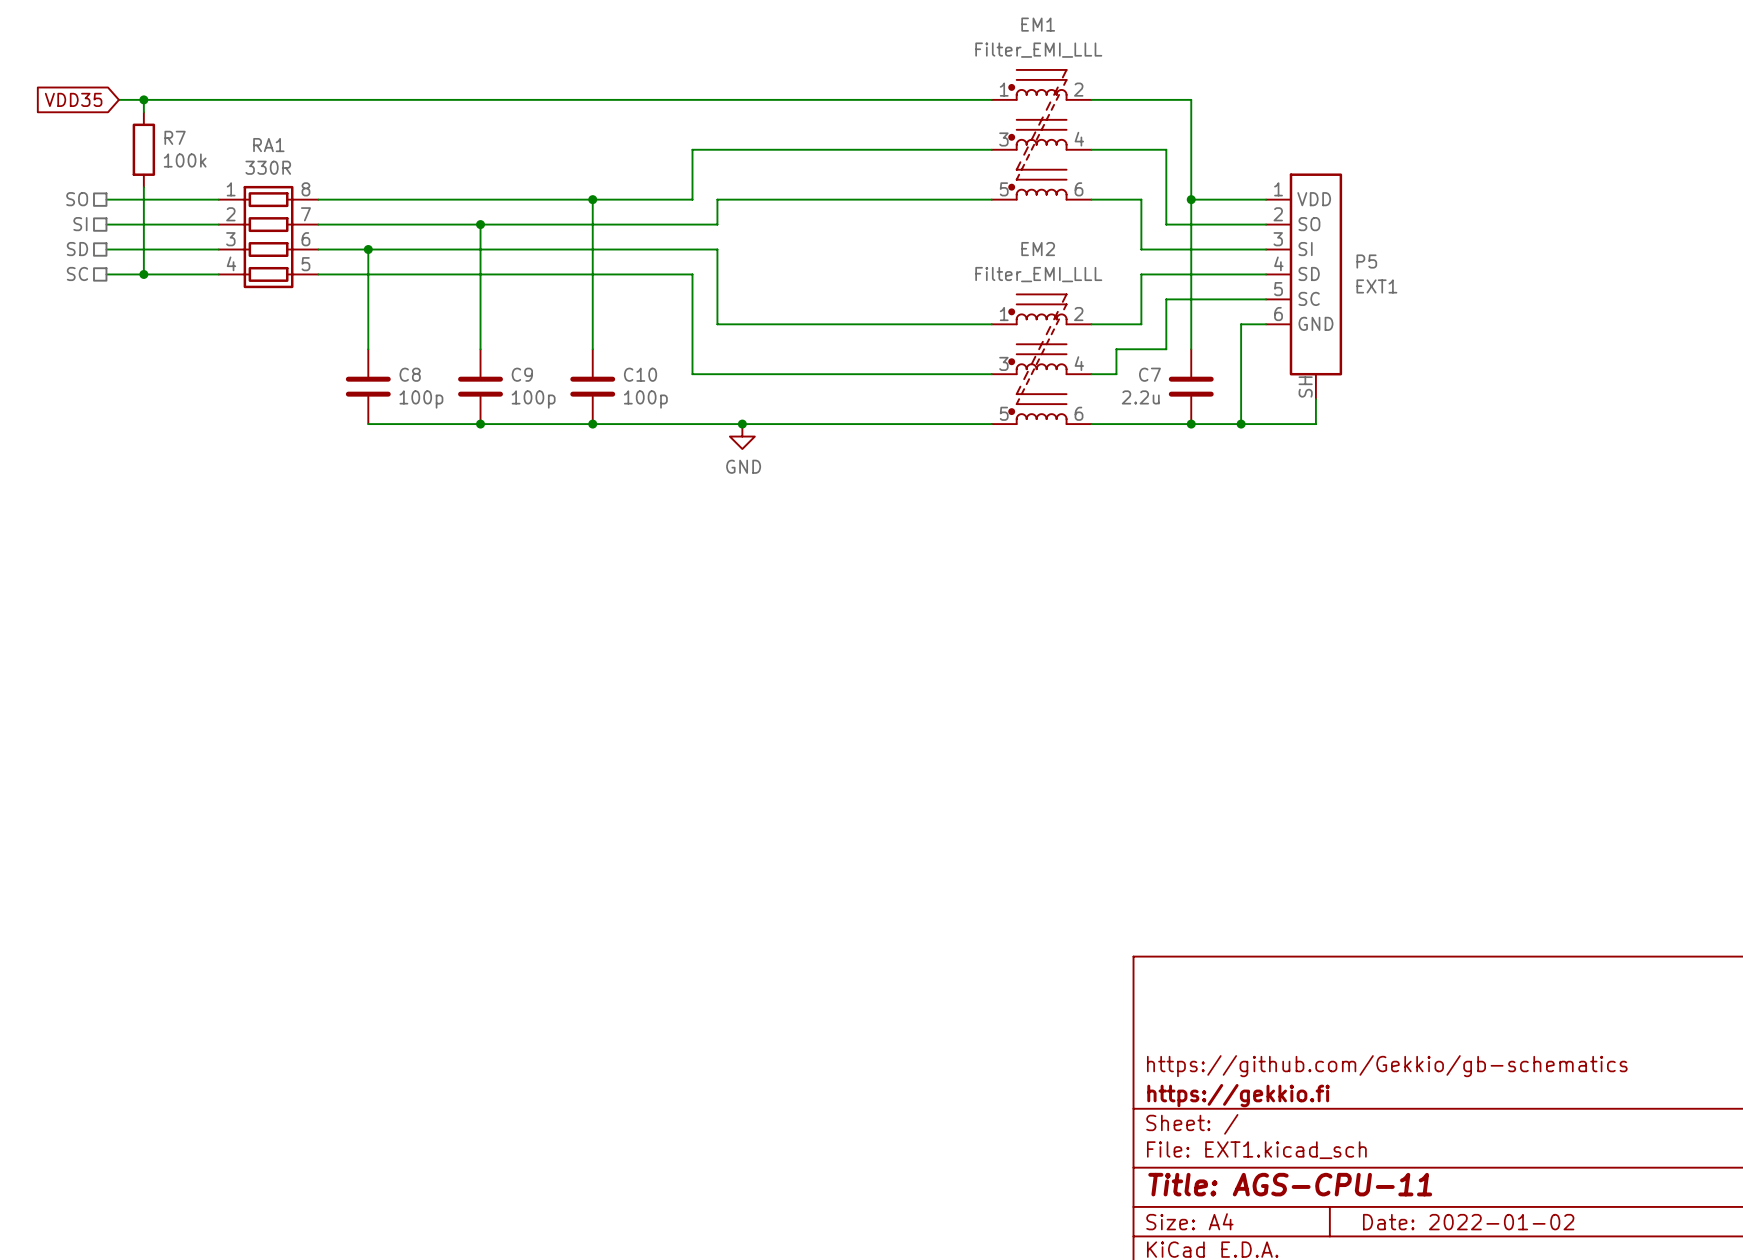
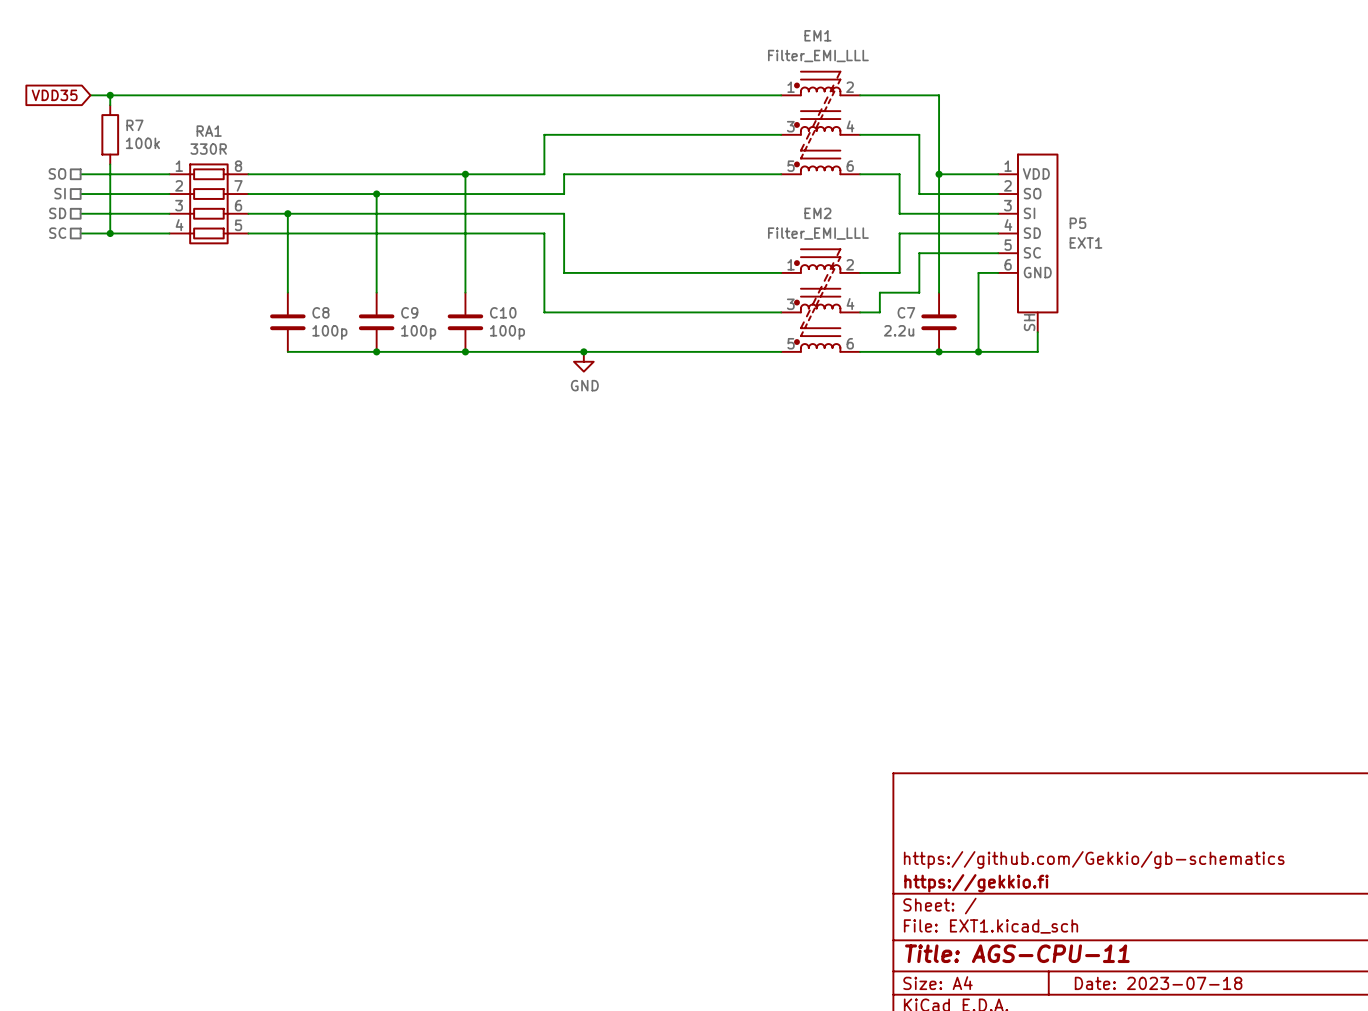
title block: Date: 2022-01-02 (1468, 1222) -> Date: 2023-07-18 (1158, 983)

